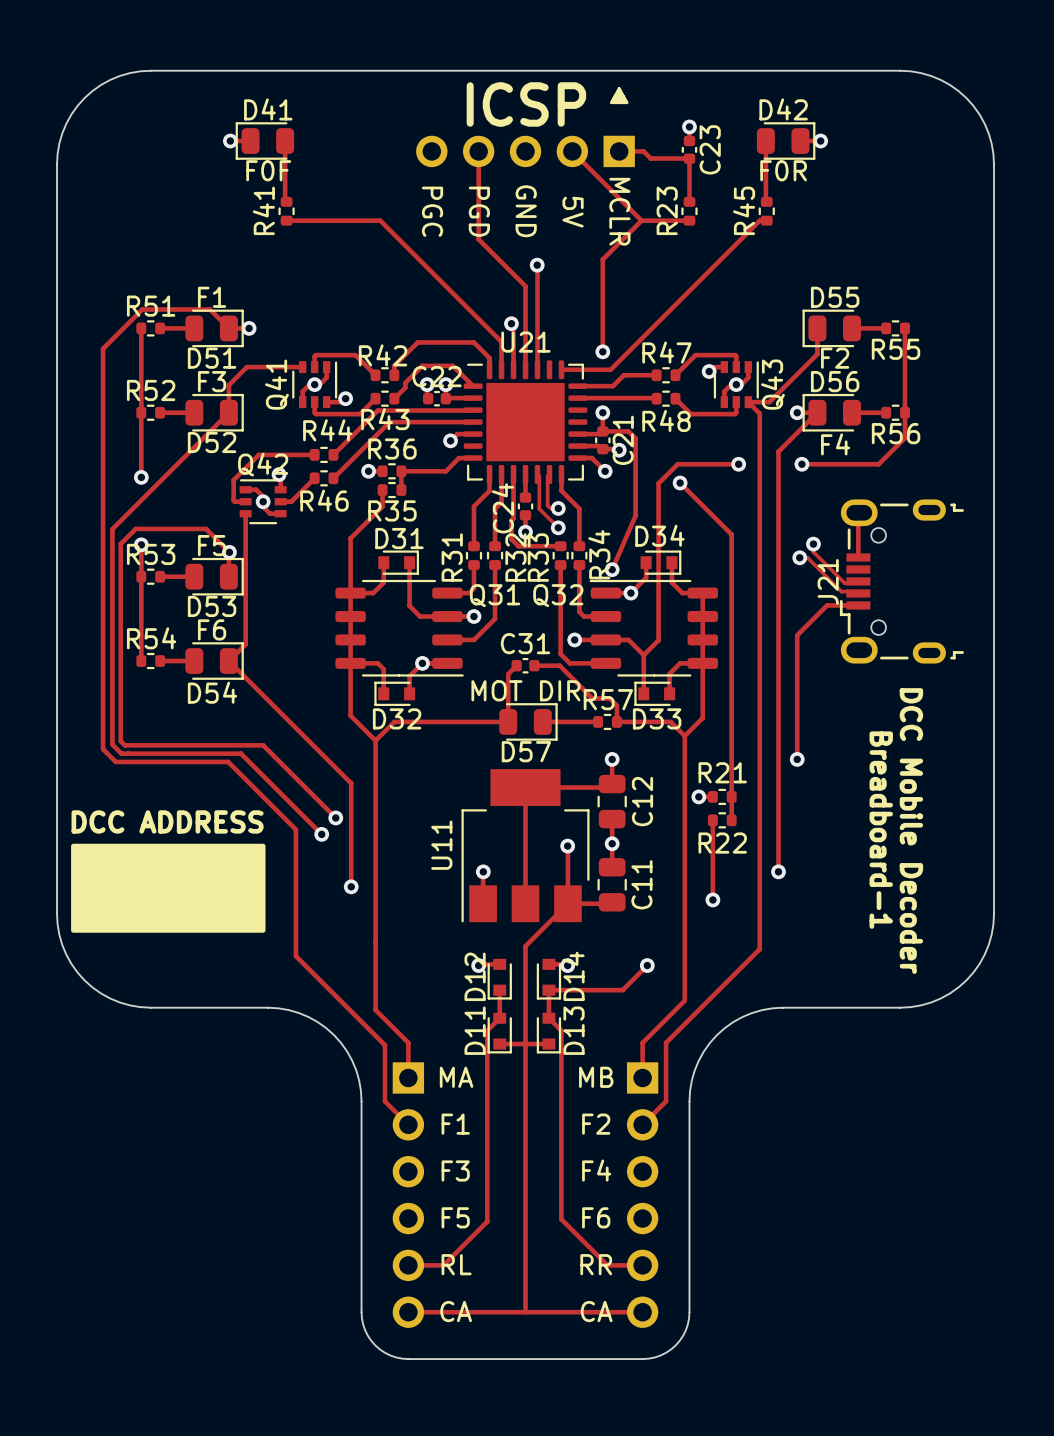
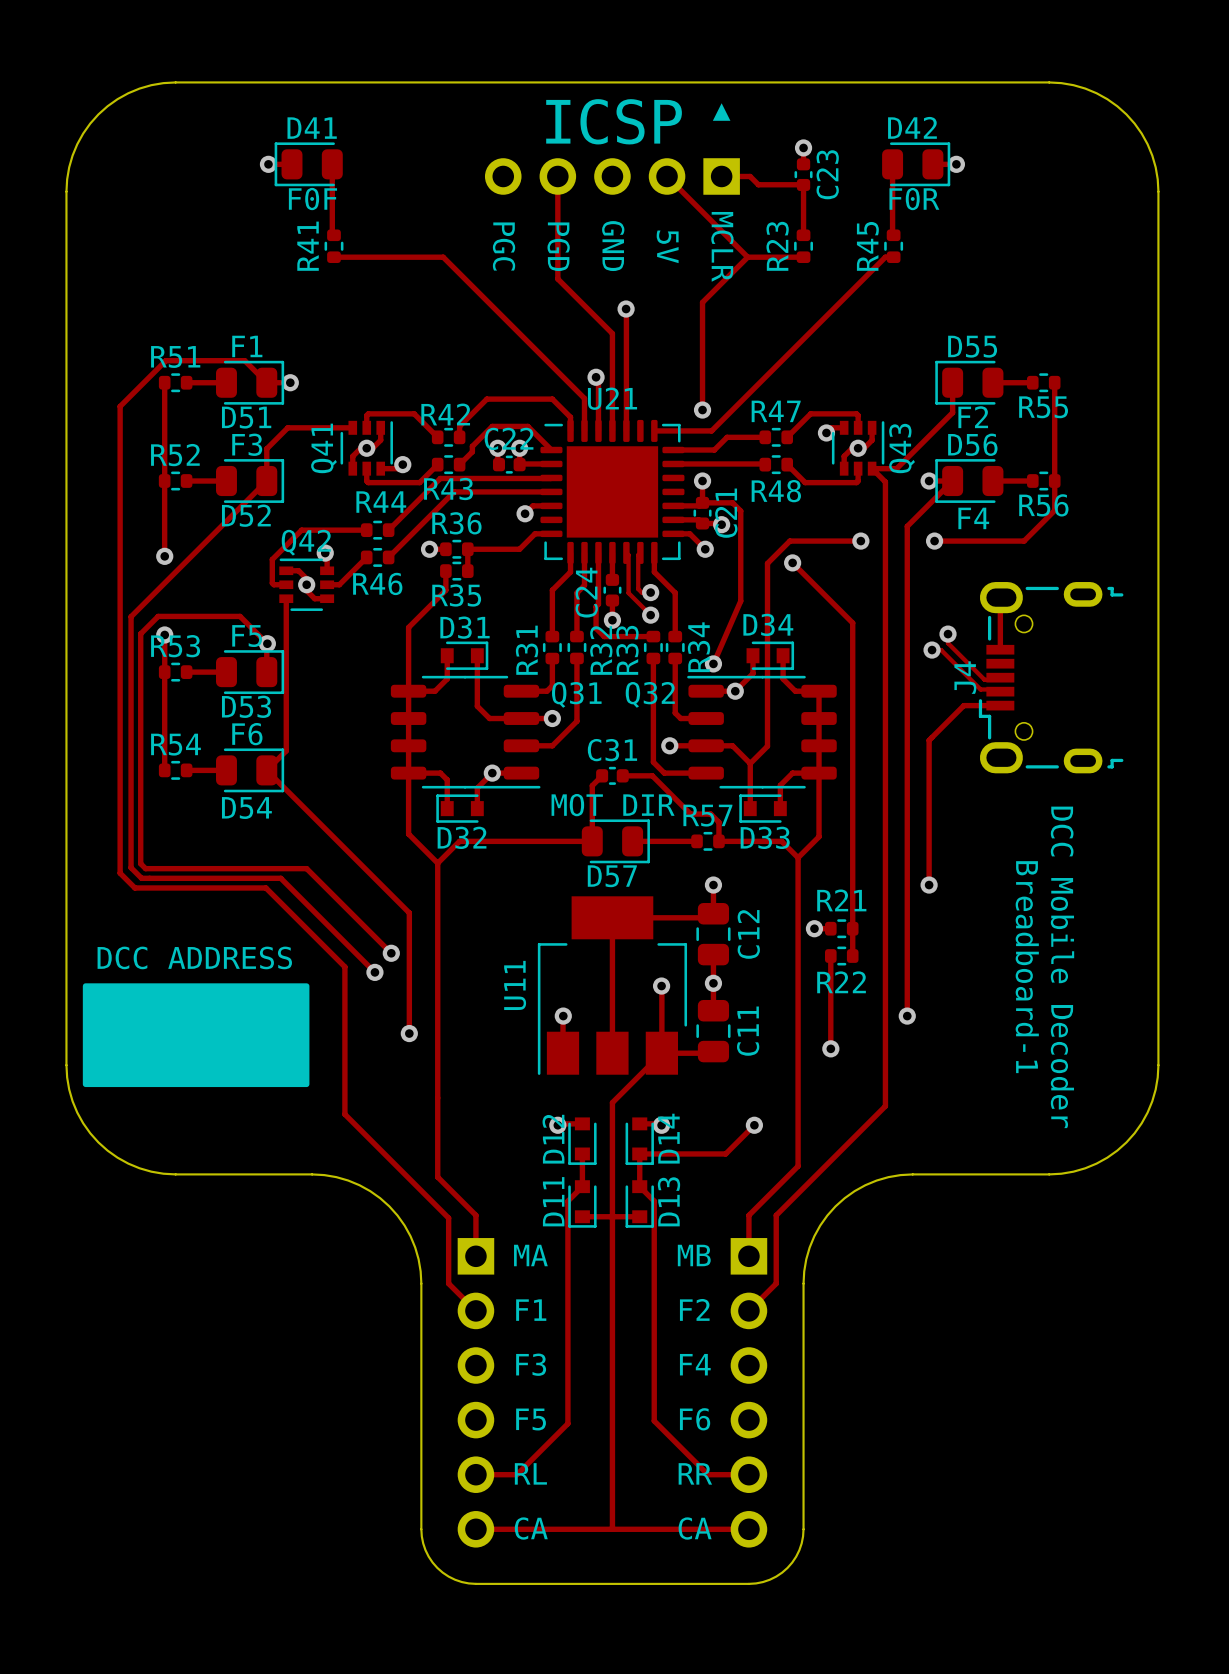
J21 name: J21 (828, 581) -> J4 (965, 677)

